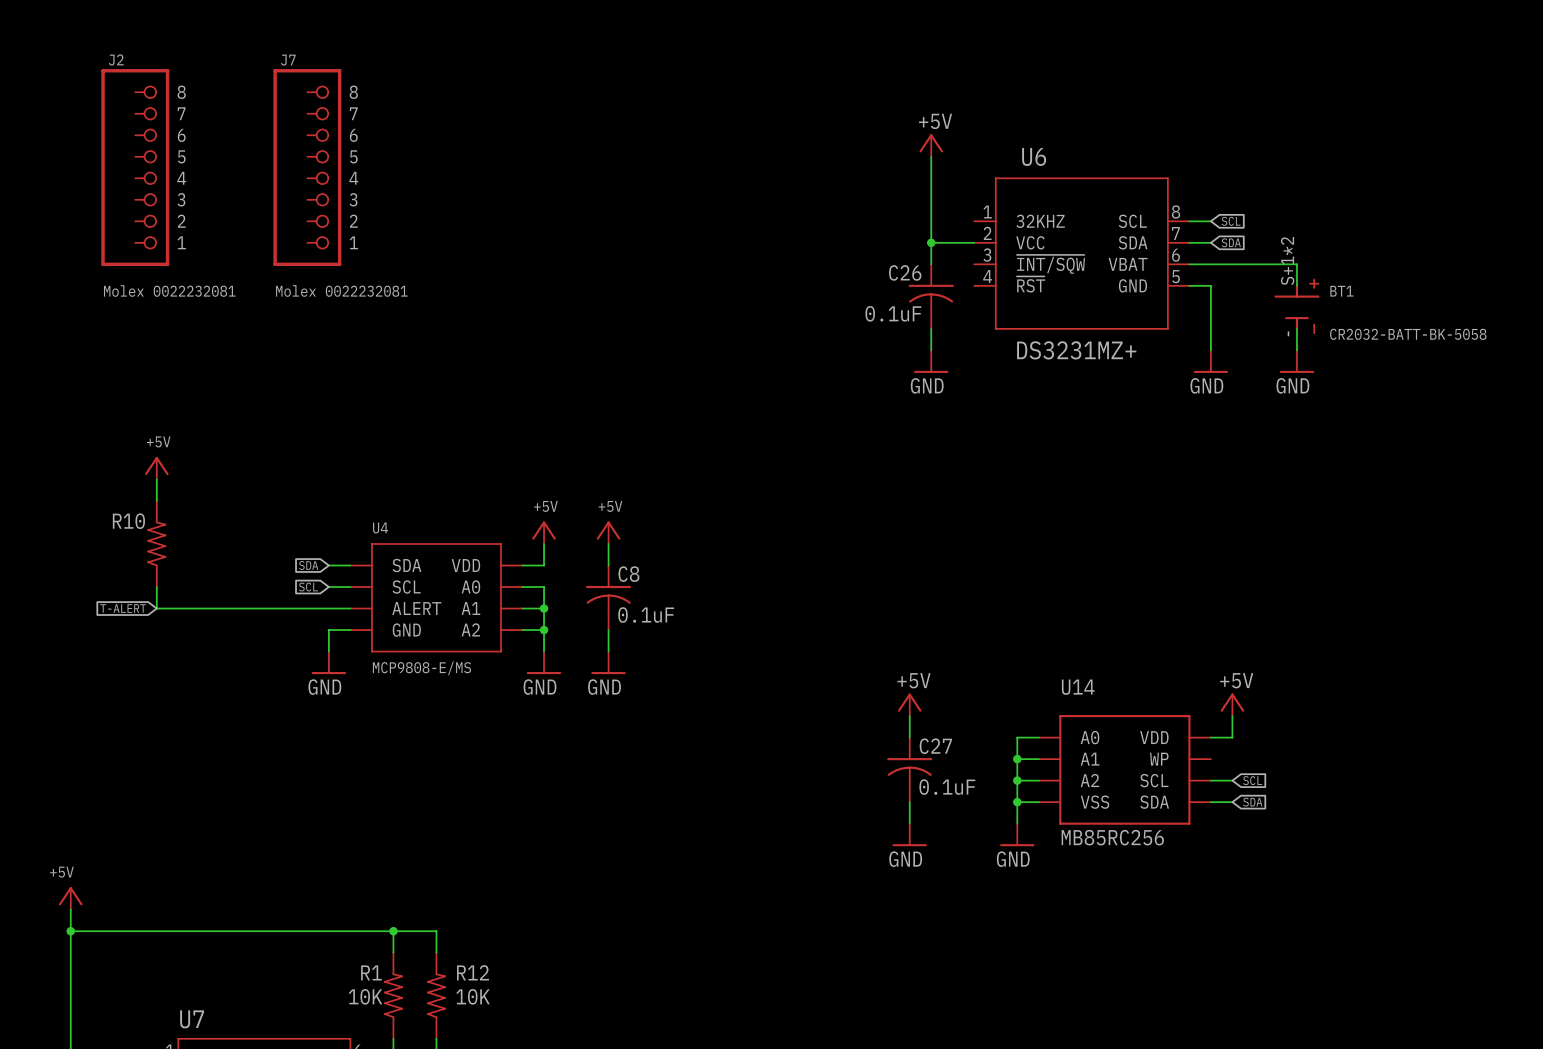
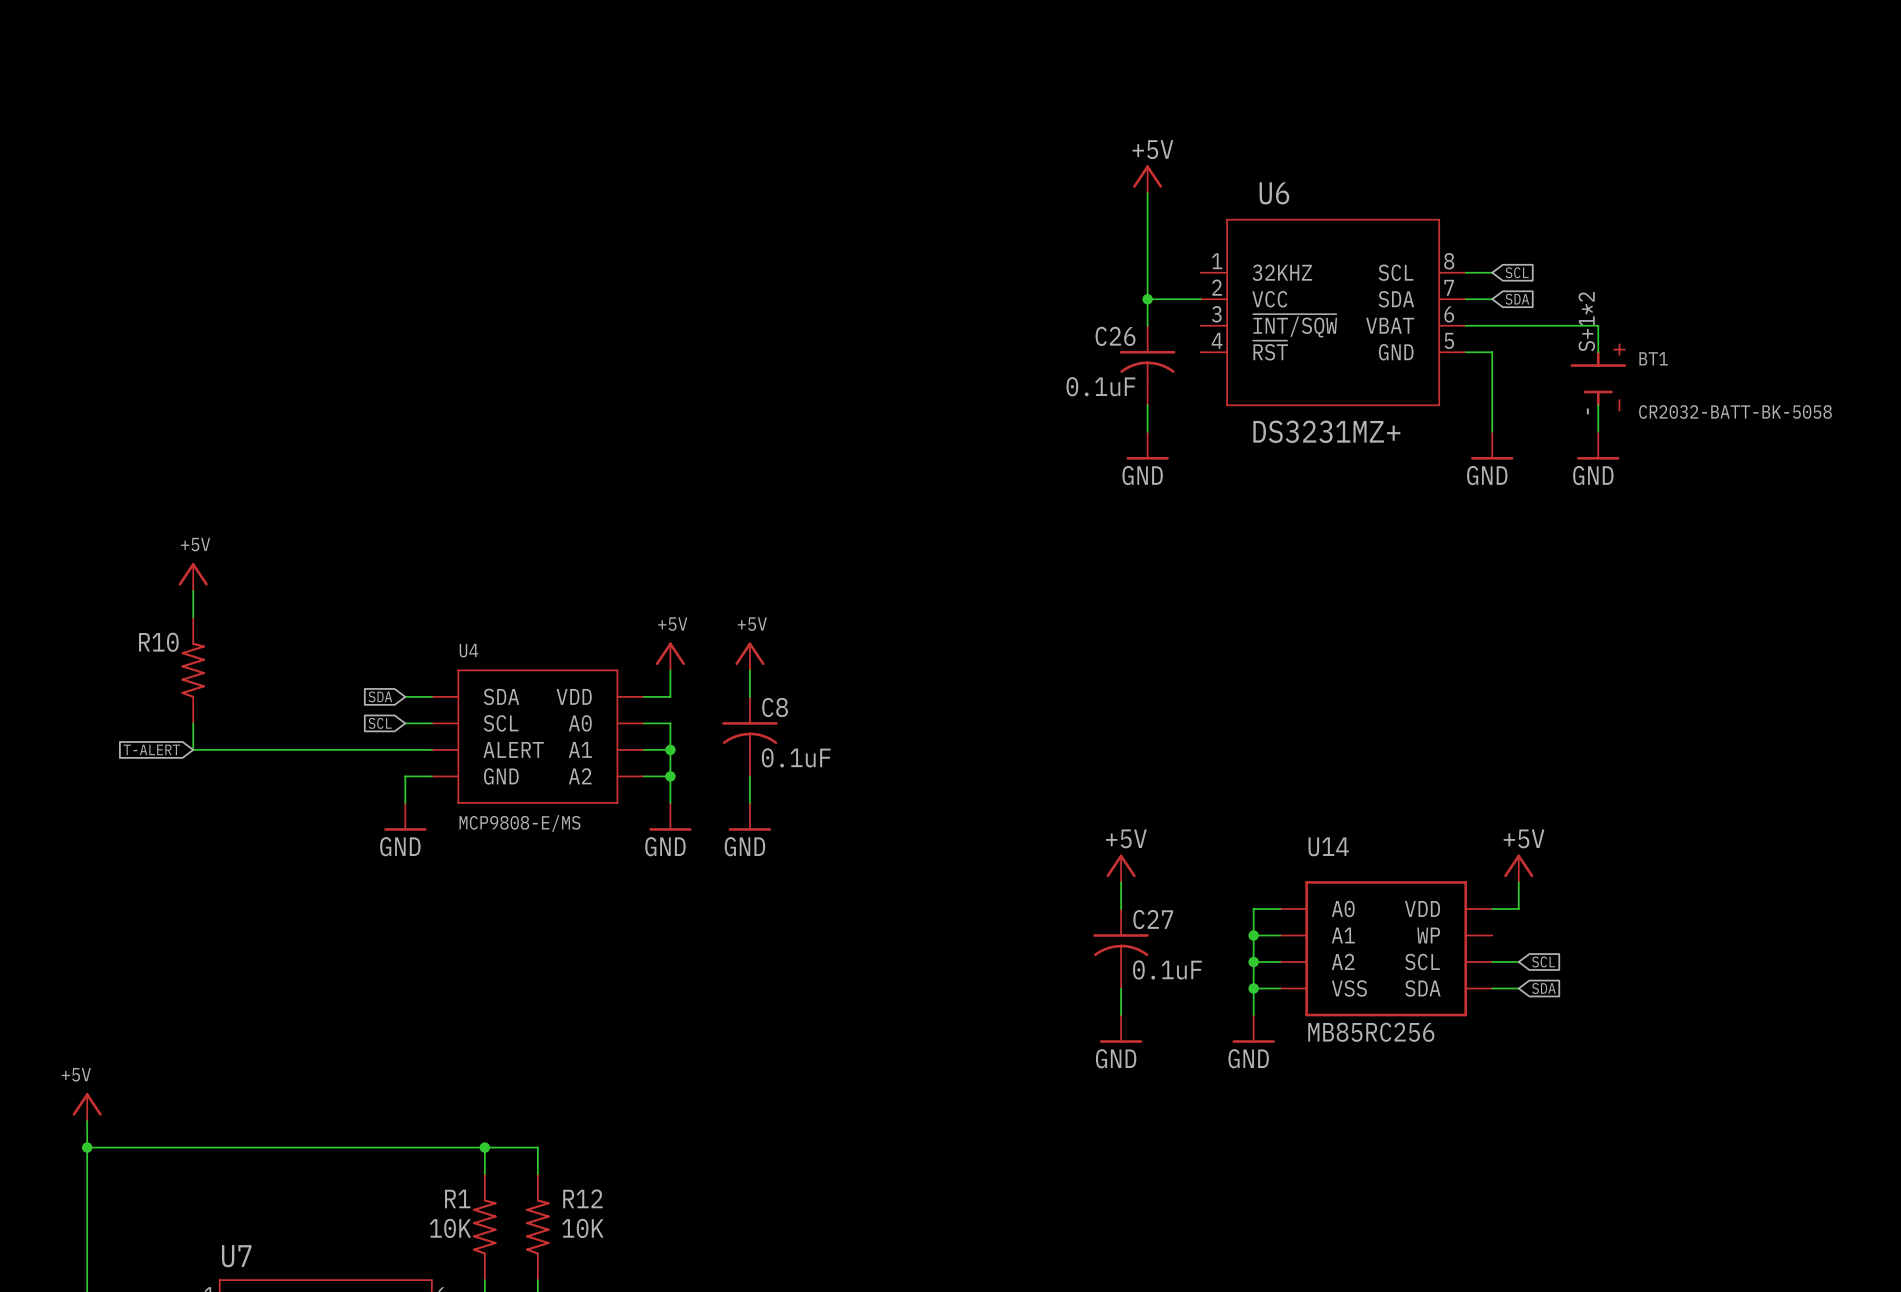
J2: Molex 0022232081 (135, 167) -> none
J7: Molex 0022232081 (307, 167) -> none

